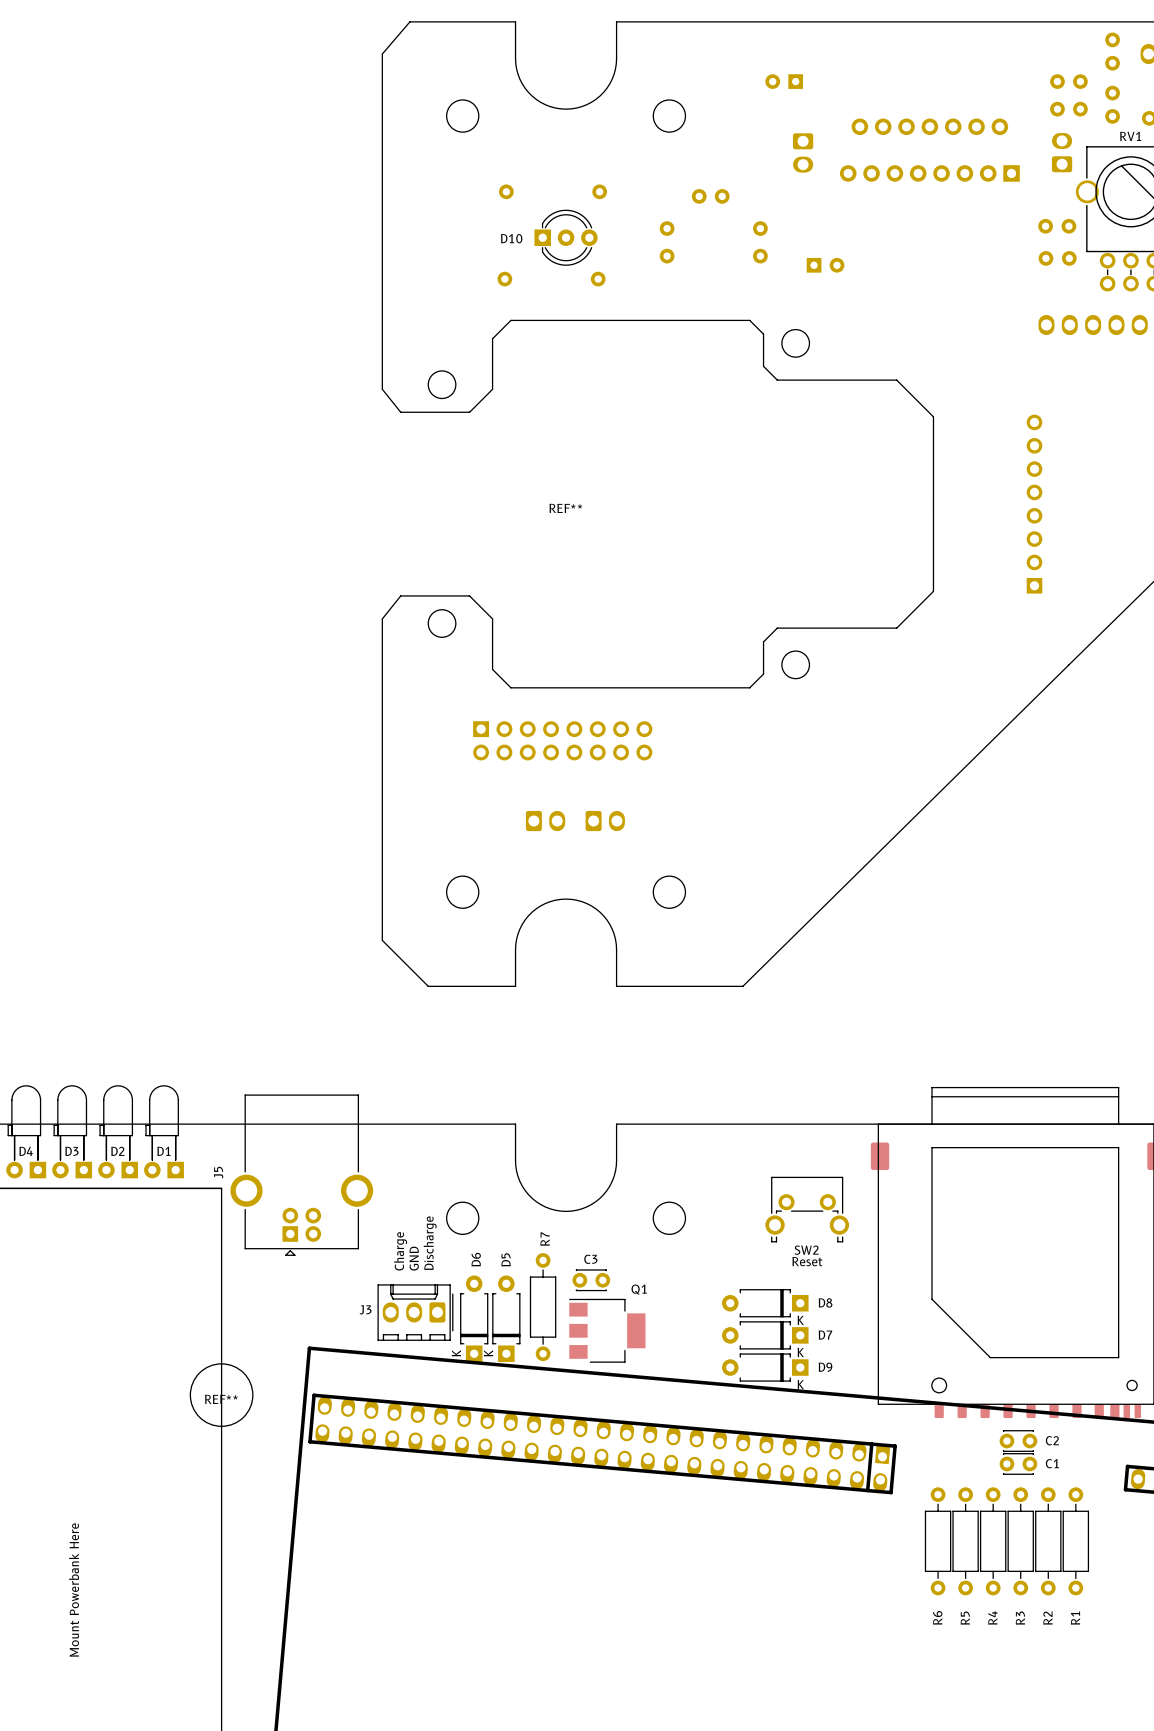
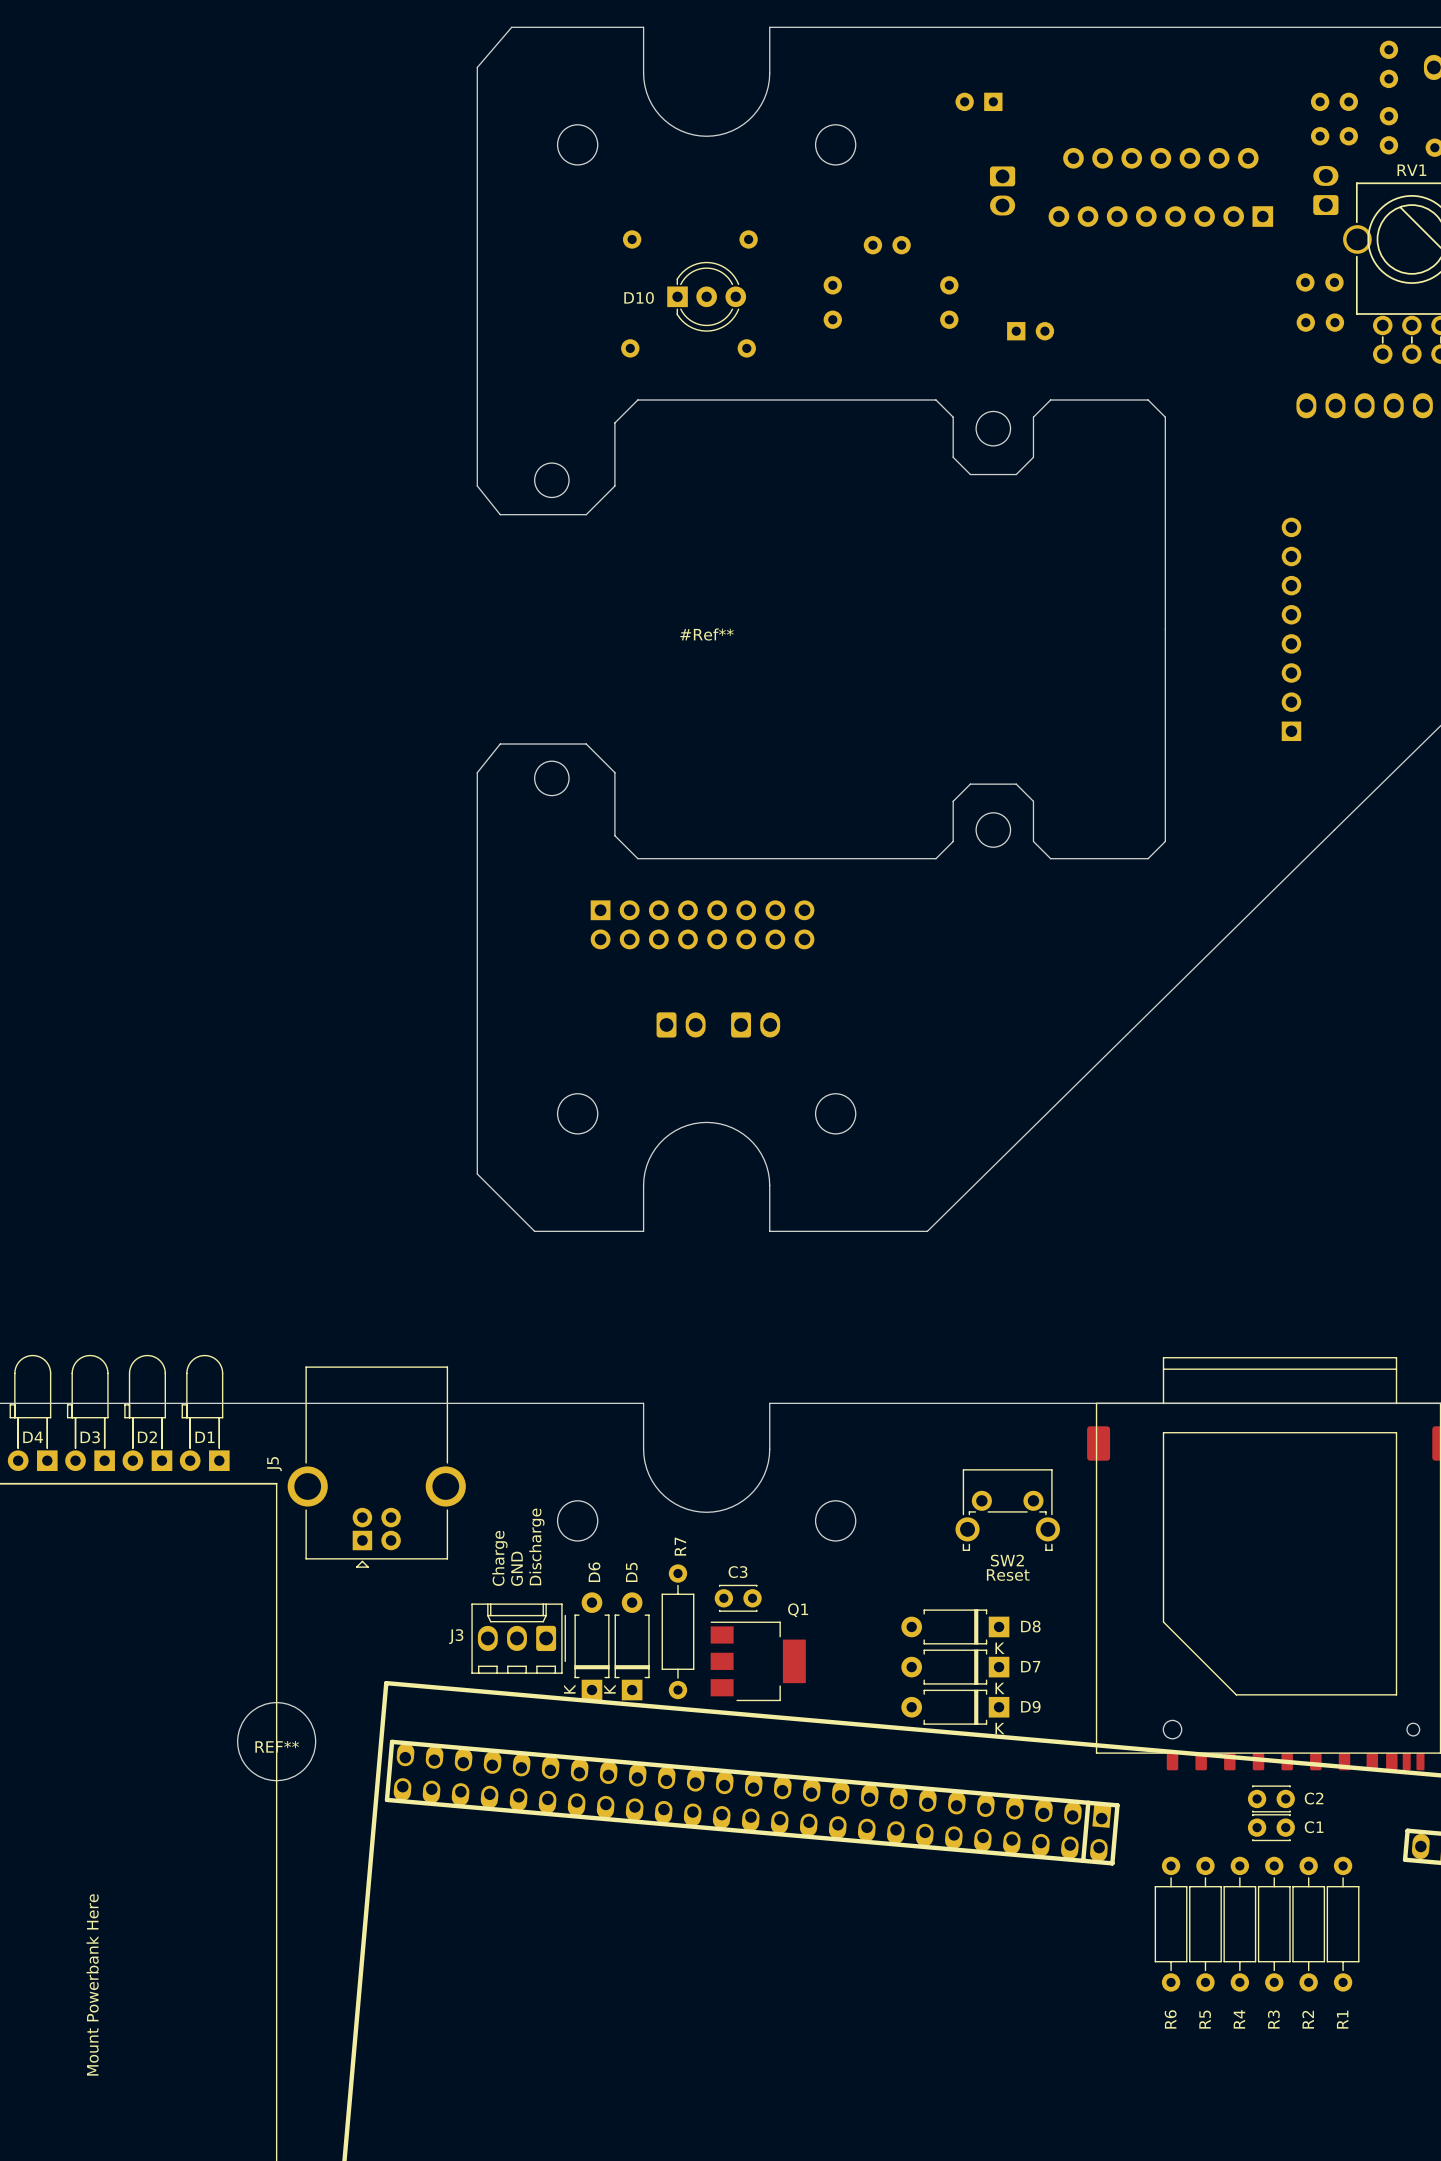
board edge: (814, 380) (896, 380) (933, 416) -> (1016, 474) (1033, 457) (1033, 417) (1050, 400) (1148, 400) (1165, 417) (1165, 520)
REF** name: REF** (565, 508) -> #Ref** (707, 634)
board edge: (933, 591) (896, 628) (814, 628) -> (1165, 738) (1165, 841) (1148, 858) (1050, 858) (1033, 841) (1033, 801) (1016, 784)

